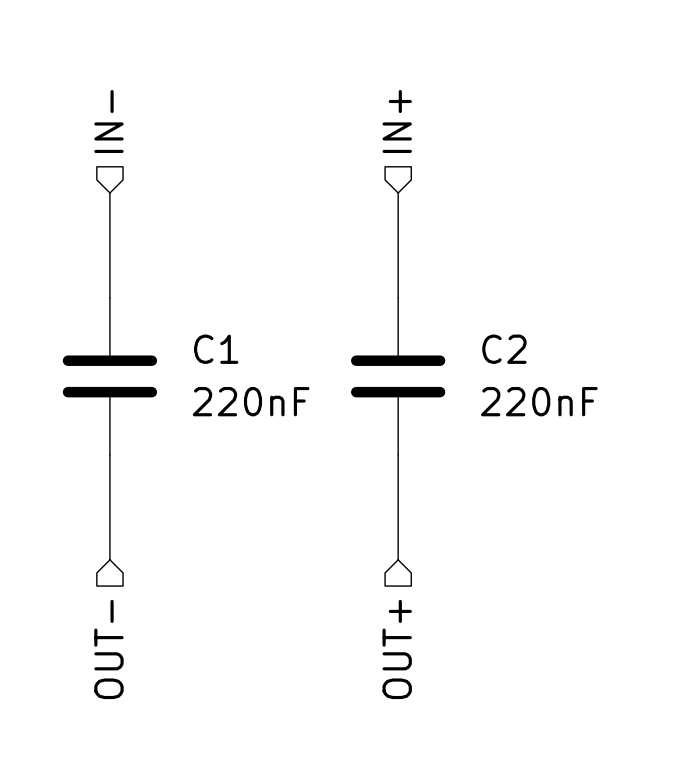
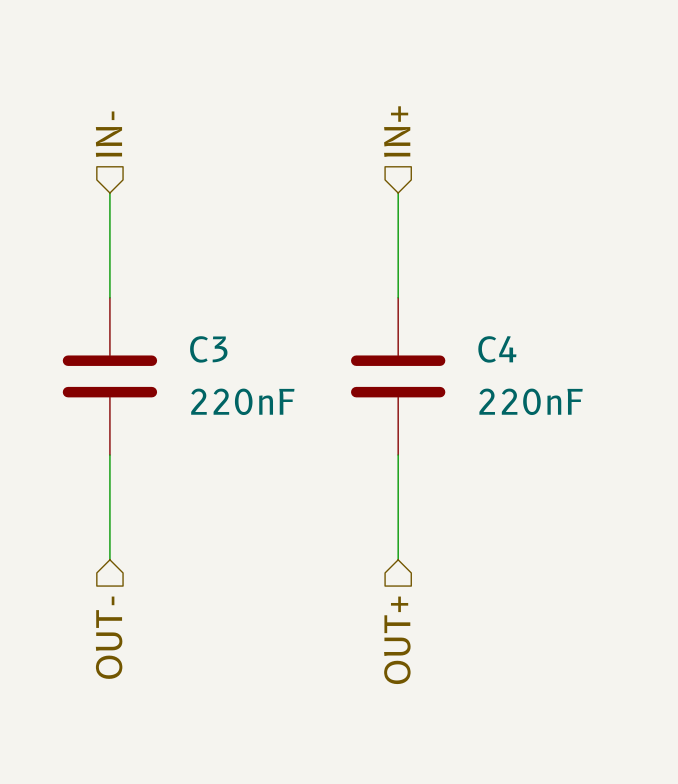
C1 name: C1 (216, 349) -> C3 (208, 349)
C2 name: C2 (504, 349) -> C4 (497, 349)

